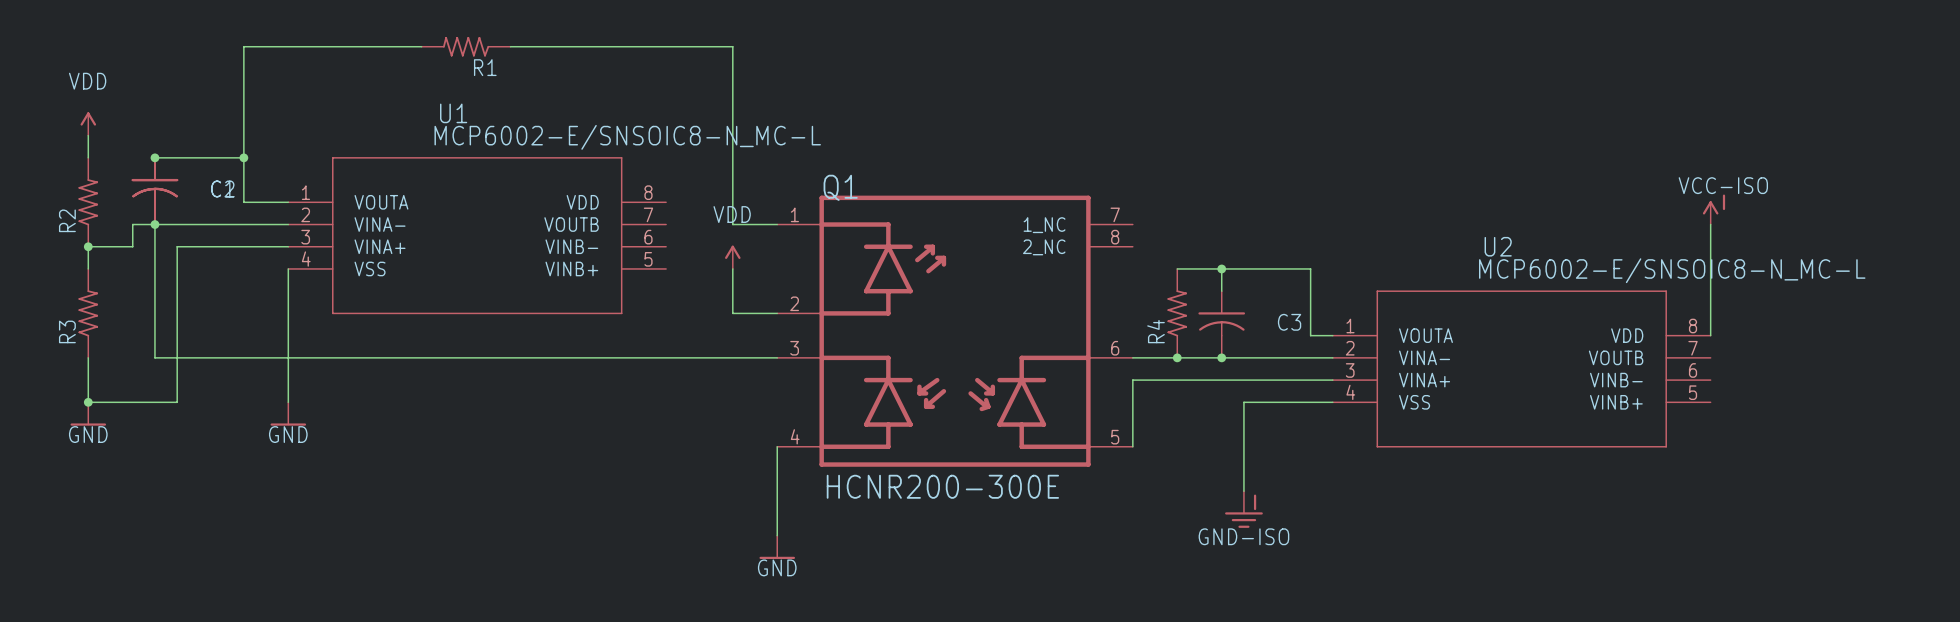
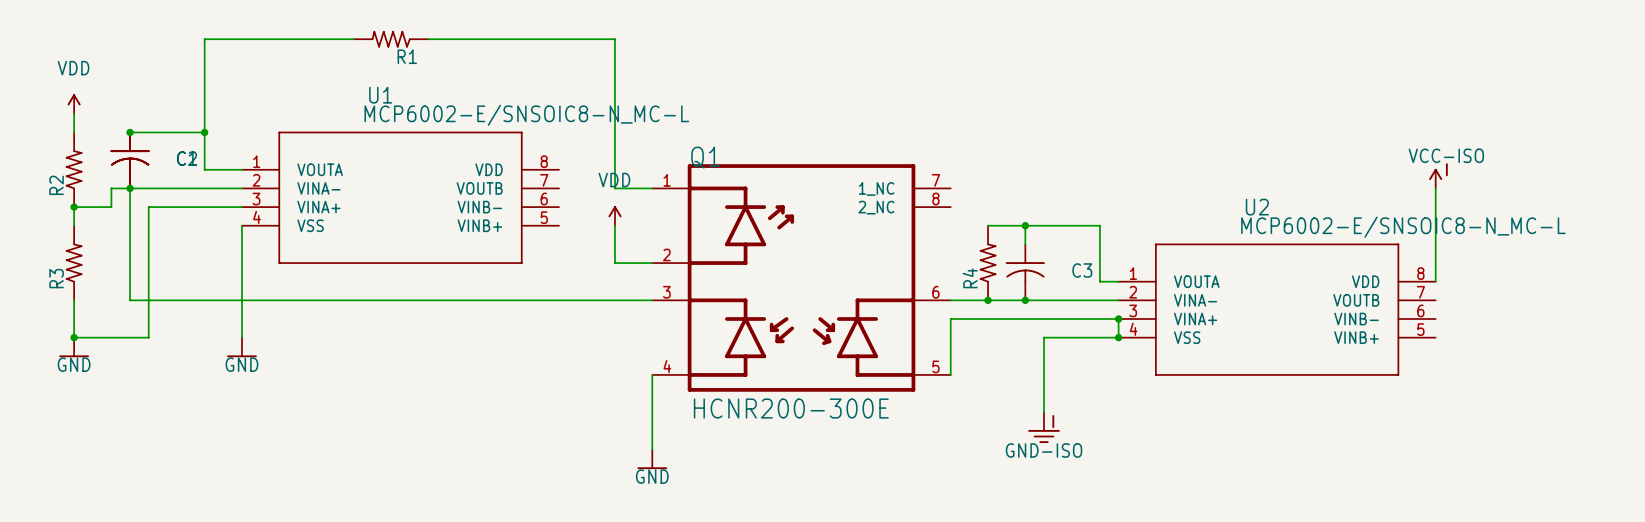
wire: none -> (1118, 318) (1118, 337)
junction: none -> (1118, 318)
junction: none -> (1118, 337)

